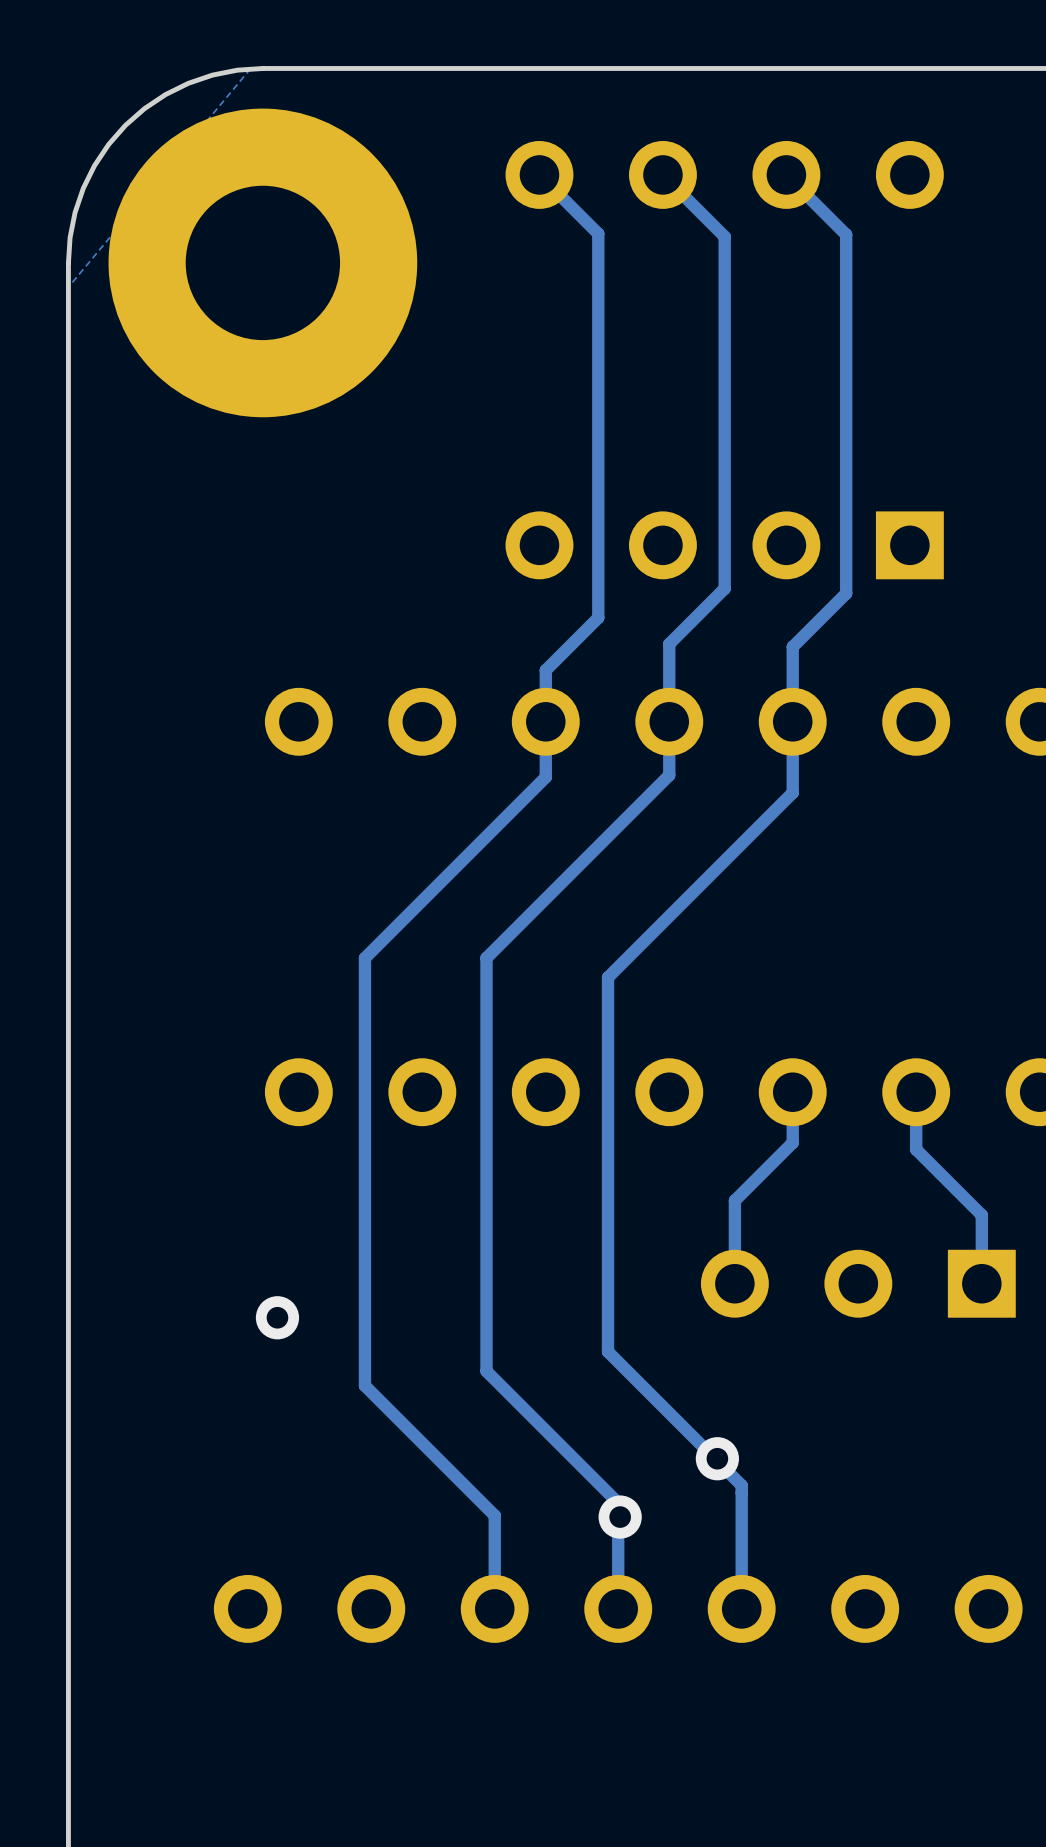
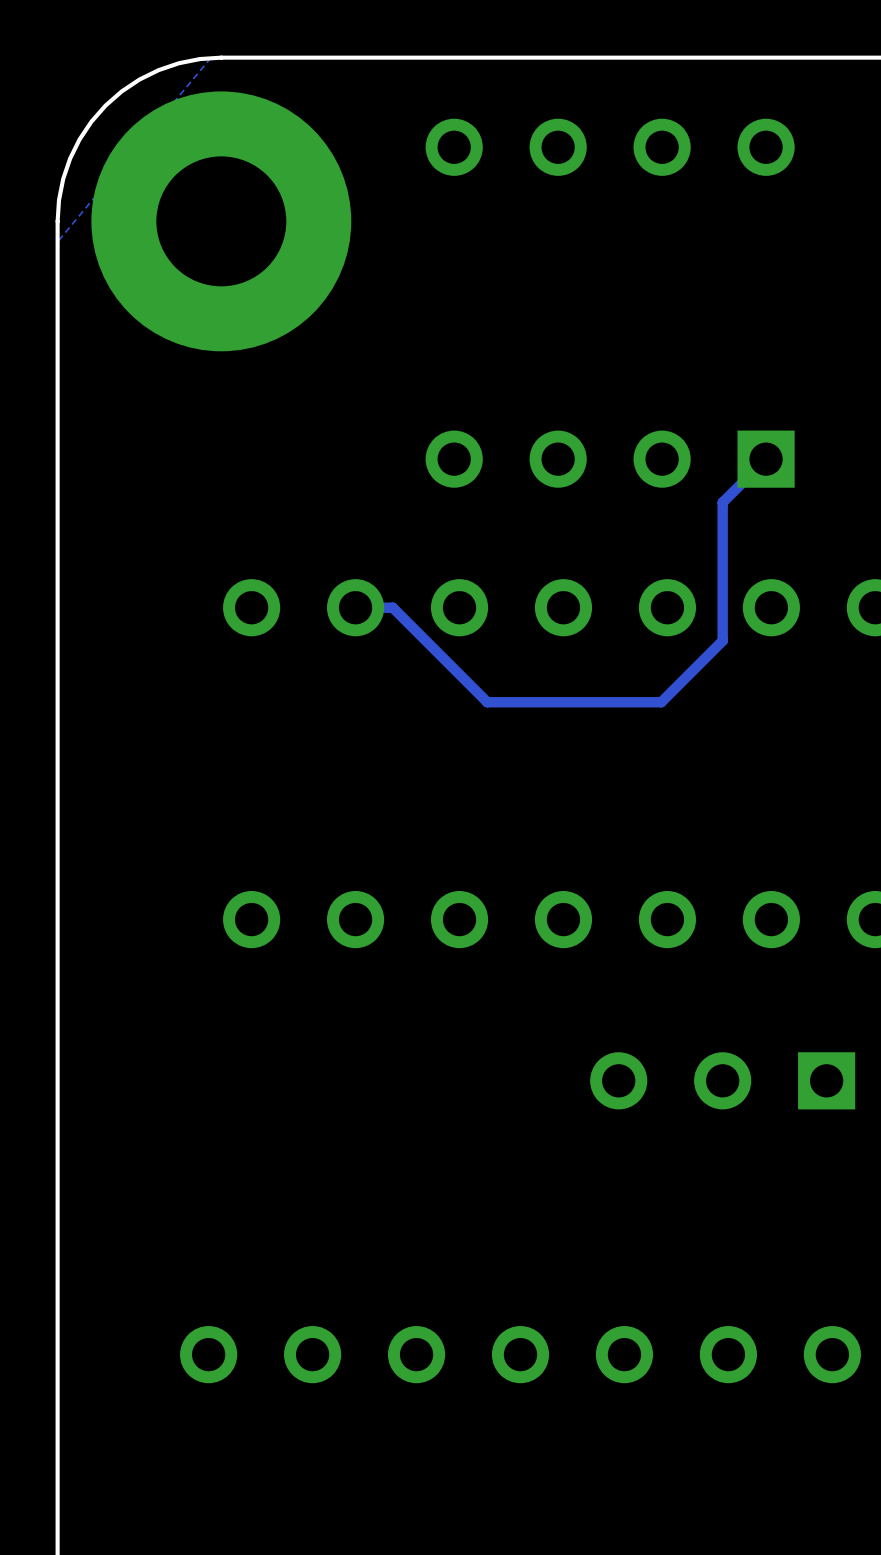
track: (539, 174) (598, 233) (598, 617) (545, 670) (545, 777) (364, 958) (364, 1385) (494, 1515) (494, 1608) -> none
track: (662, 174) (724, 236) (724, 588) (669, 644) (669, 775) (486, 958) (486, 1371) (618, 1502) (618, 1608) -> none
track: (786, 174) (846, 234) (846, 593) (792, 646) (792, 792) (608, 977) (608, 1351) (741, 1485) (741, 1608) -> none
track: none -> (766, 459) (722, 502) (722, 640) (661, 702) (487, 702) (392, 607) (355, 607)
track: (792, 1092) (792, 1142) (734, 1200) (734, 1283) -> none
track: (916, 1092) (916, 1149) (981, 1215) (981, 1283) -> none
via: (277, 1317) -> none
via: (717, 1458) -> none
via: (620, 1517) -> none

